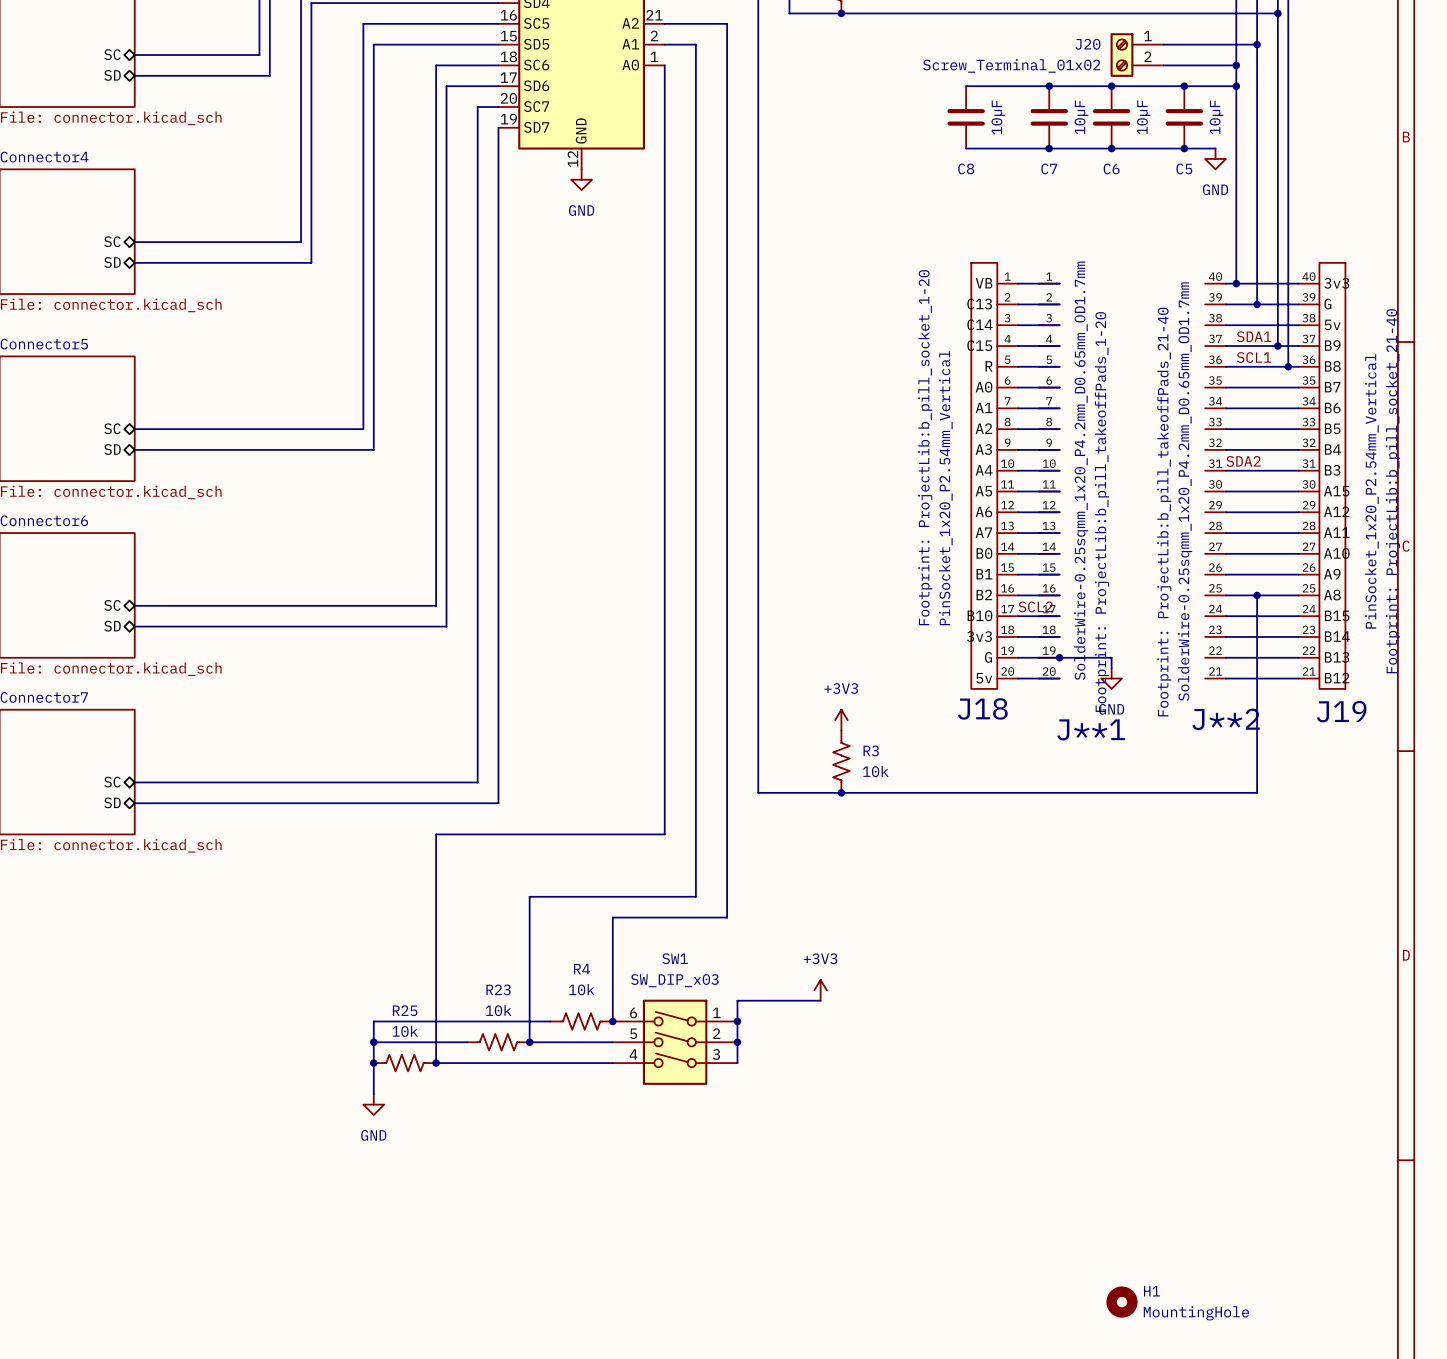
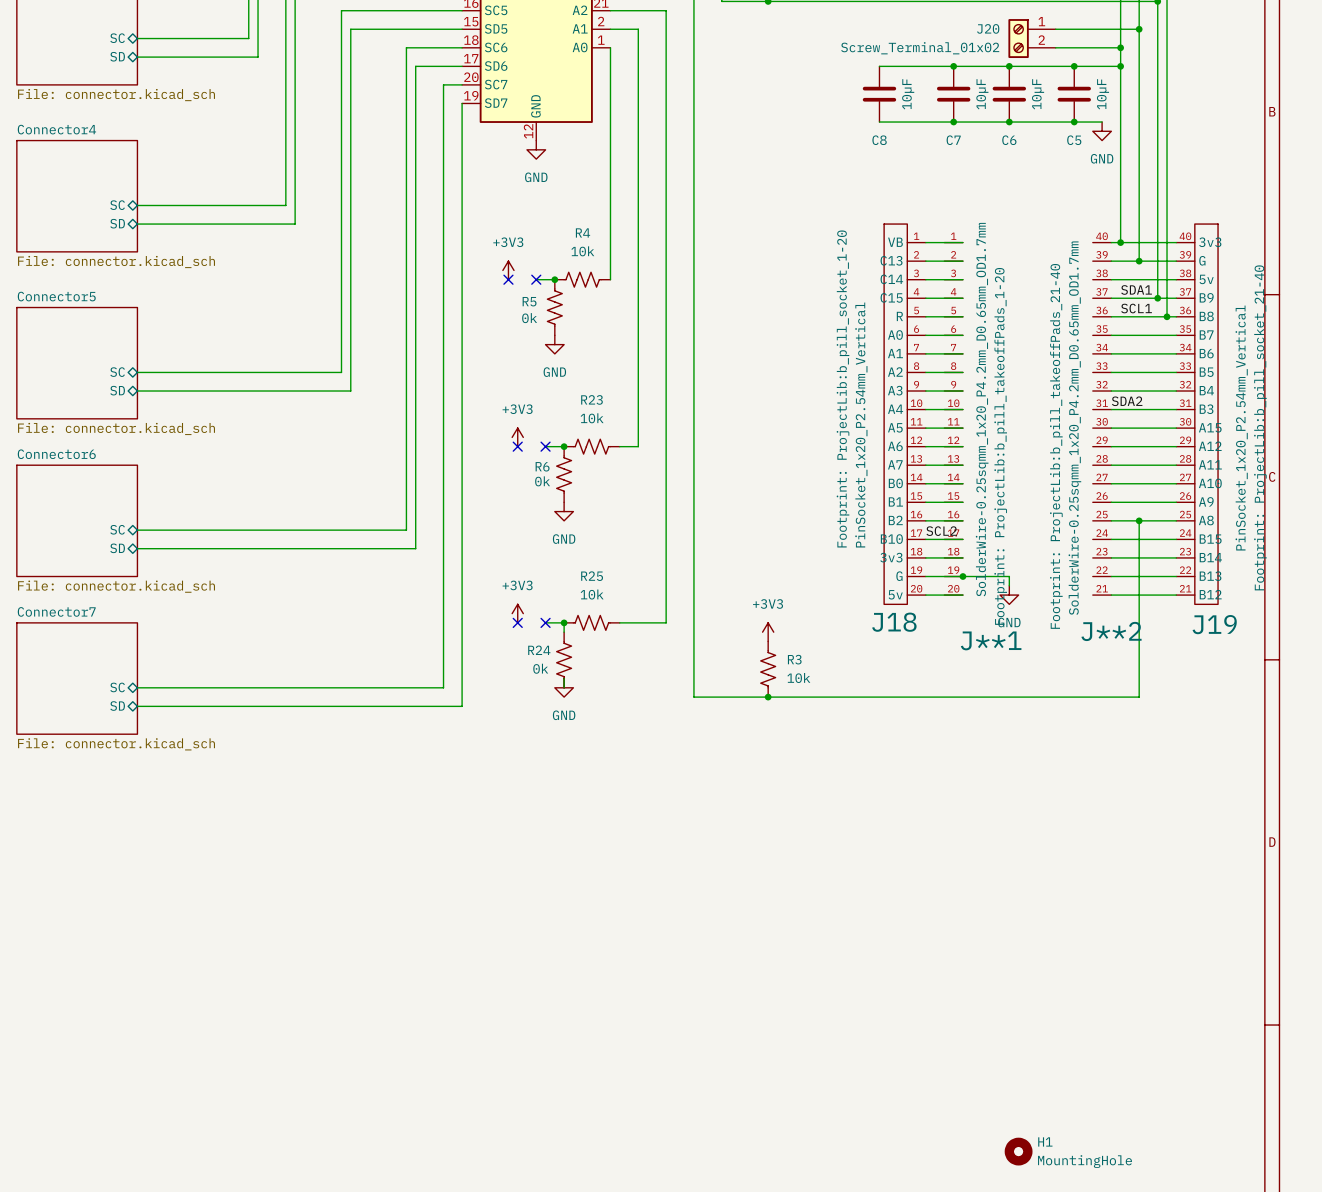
power symbol: none -> +3V3 (508, 270)
no-connect mark: none -> (508, 279)
wire: none -> (536, 279) (554, 279)
no-connect mark: none -> (536, 279)
junction: none -> (554, 279)
wire: (664, 325) (664, 834) (436, 834) (436, 1063) (612, 1063) -> none
R5: none -> 0k (554, 307)
power symbol: none -> GND (554, 344)
power symbol: none -> +3V3 (517, 437)
no-connect mark: none -> (517, 446)
wire: none -> (545, 446) (564, 446)
no-connect mark: none -> (545, 446)
junction: none -> (564, 446)
wire: (695, 512) (695, 896) (529, 896) (529, 1042) (612, 1042) -> (638, 446) (619, 446)
R6: none -> 0k (564, 474)
power symbol: none -> GND (564, 511)
power symbol: none -> +3V3 (517, 613)
no-connect mark: none -> (517, 622)
wire: none -> (545, 622) (564, 622) (564, 632)
no-connect mark: none -> (545, 622)
junction: none -> (564, 622)
wire: (727, 709) (727, 917) (612, 917) (612, 1021) -> (666, 622) (619, 622)
R24: none -> 0k (564, 659)
wire: none -> (564, 678) (564, 687)
power symbol: none -> GND (564, 687)
power symbol: +3V3 (820, 990) -> none
wire: (820, 1000) (737, 1000) (737, 1063) -> none
wire: (550, 1021) (373, 1021) (373, 1094) -> none
R4 position: (581, 1021) -> (582, 279)
junction: (612, 1021) -> none
junction: (737, 1021) -> none
wire: (373, 1042) (467, 1042) -> none
junction: (373, 1042) -> none
R23 position: (498, 1042) -> (591, 446)
junction: (529, 1042) -> none
SW1: SW_DIP_x03 (675, 1042) -> none
junction: (737, 1042) -> none
junction: (373, 1063) -> none
R25 position: (404, 1063) -> (591, 622)
junction: (436, 1063) -> none
power symbol: GND (373, 1104) -> none

